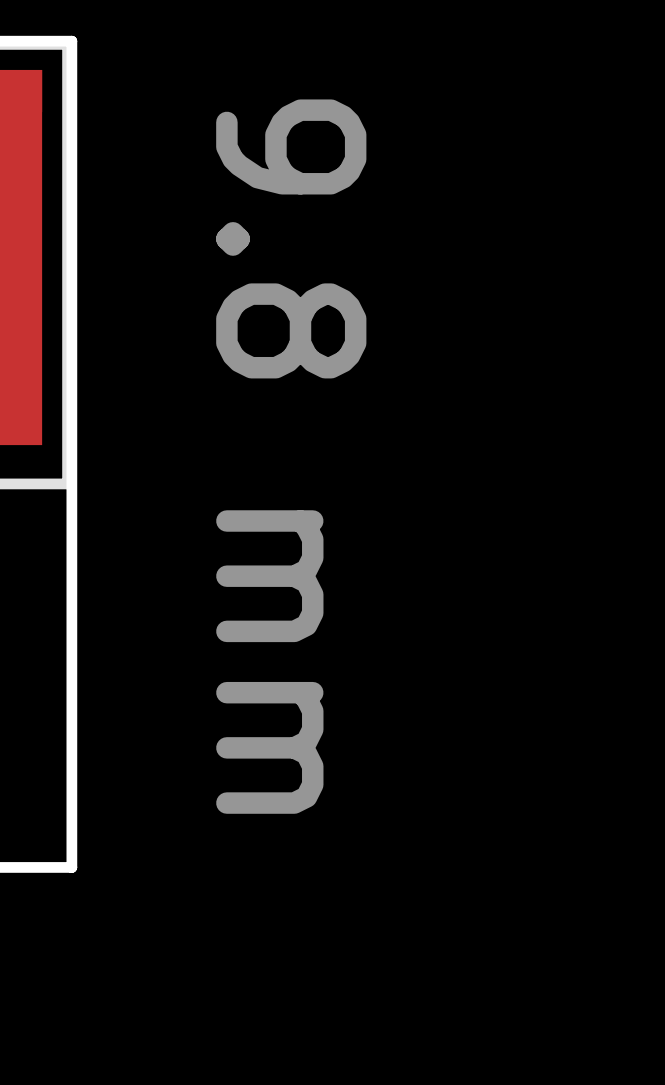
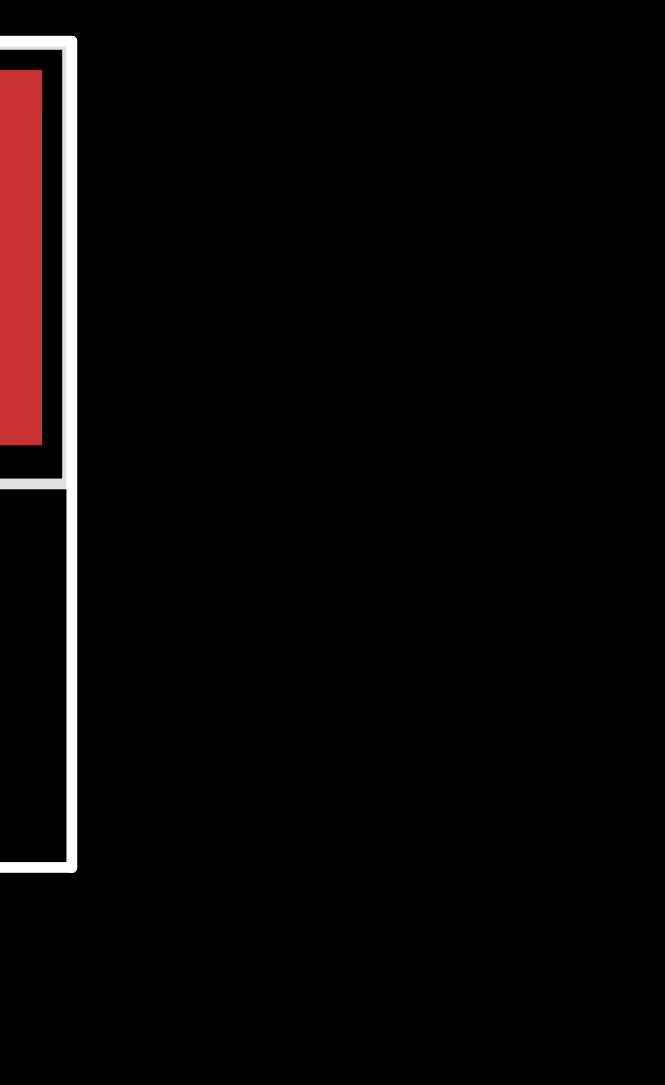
text: 9.8 mm (291, 456) -> none

